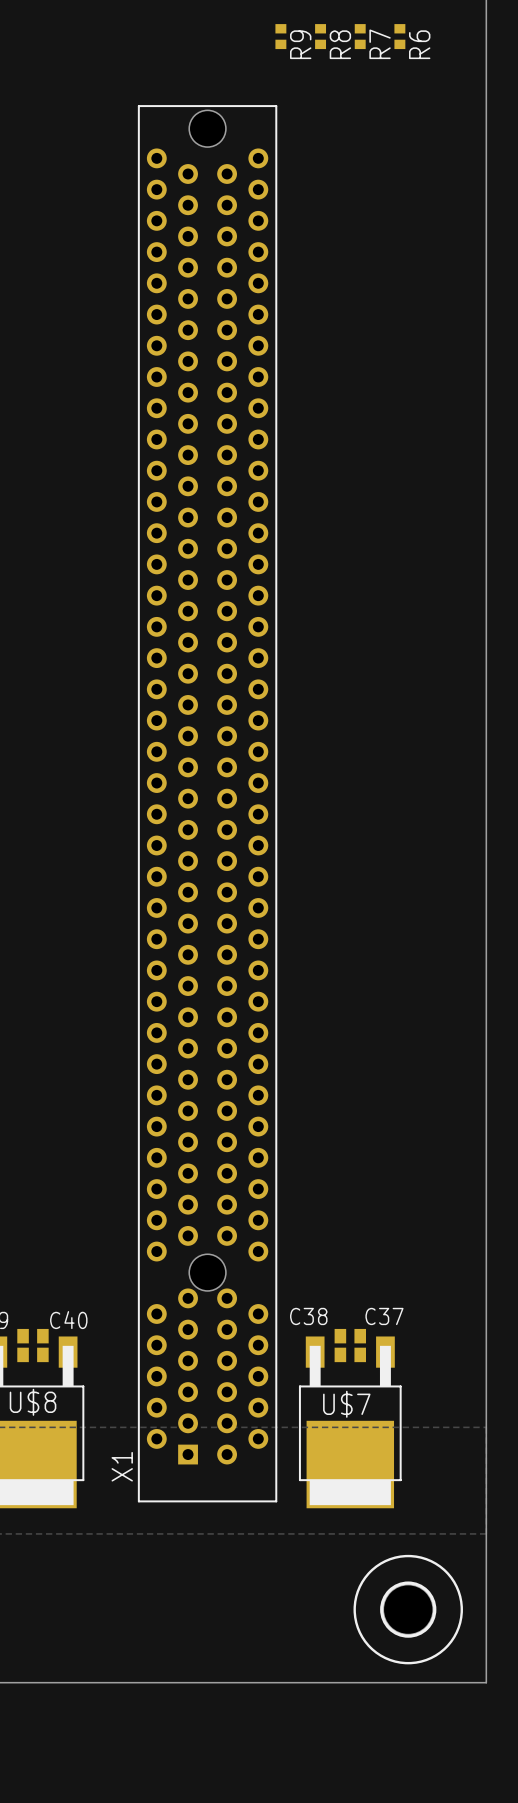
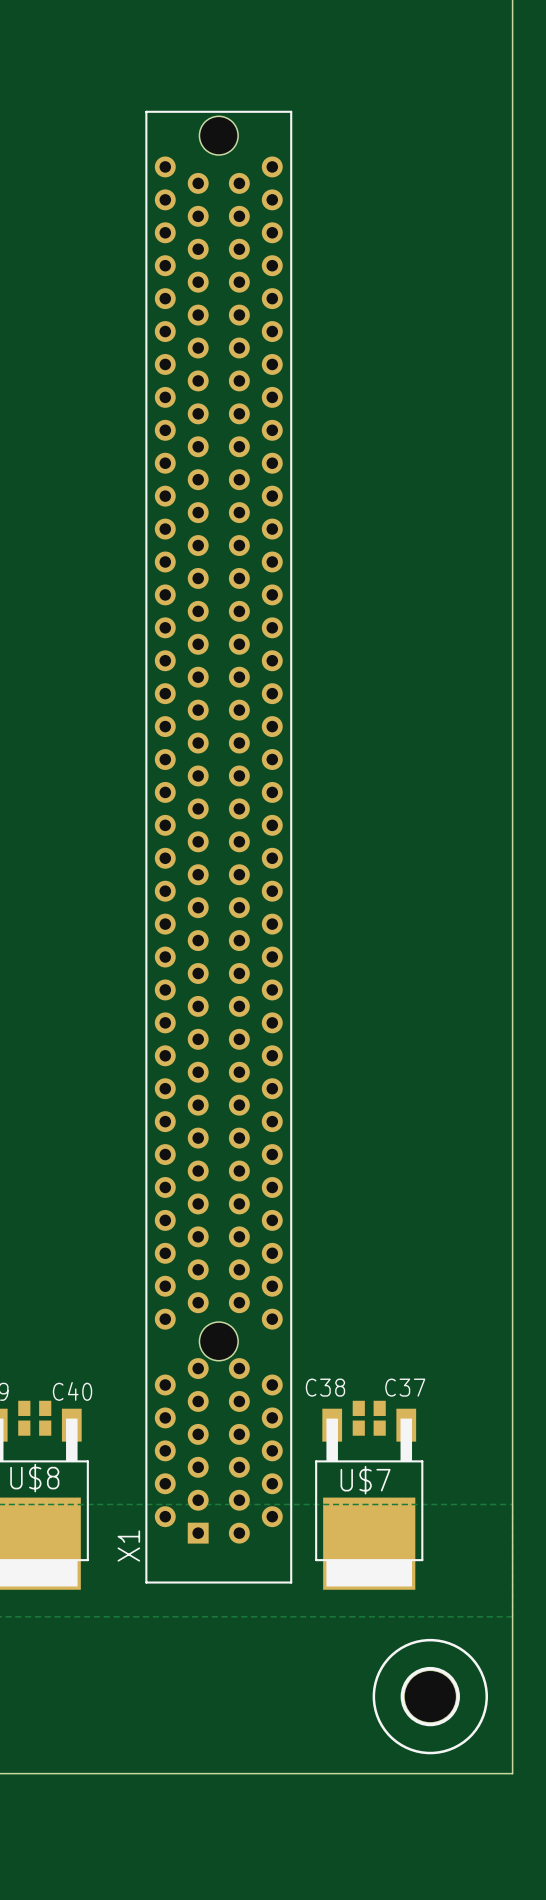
R9: (280, 36) -> none
R8: (320, 36) -> none
R7: (360, 36) -> none
R6: (399, 36) -> none

